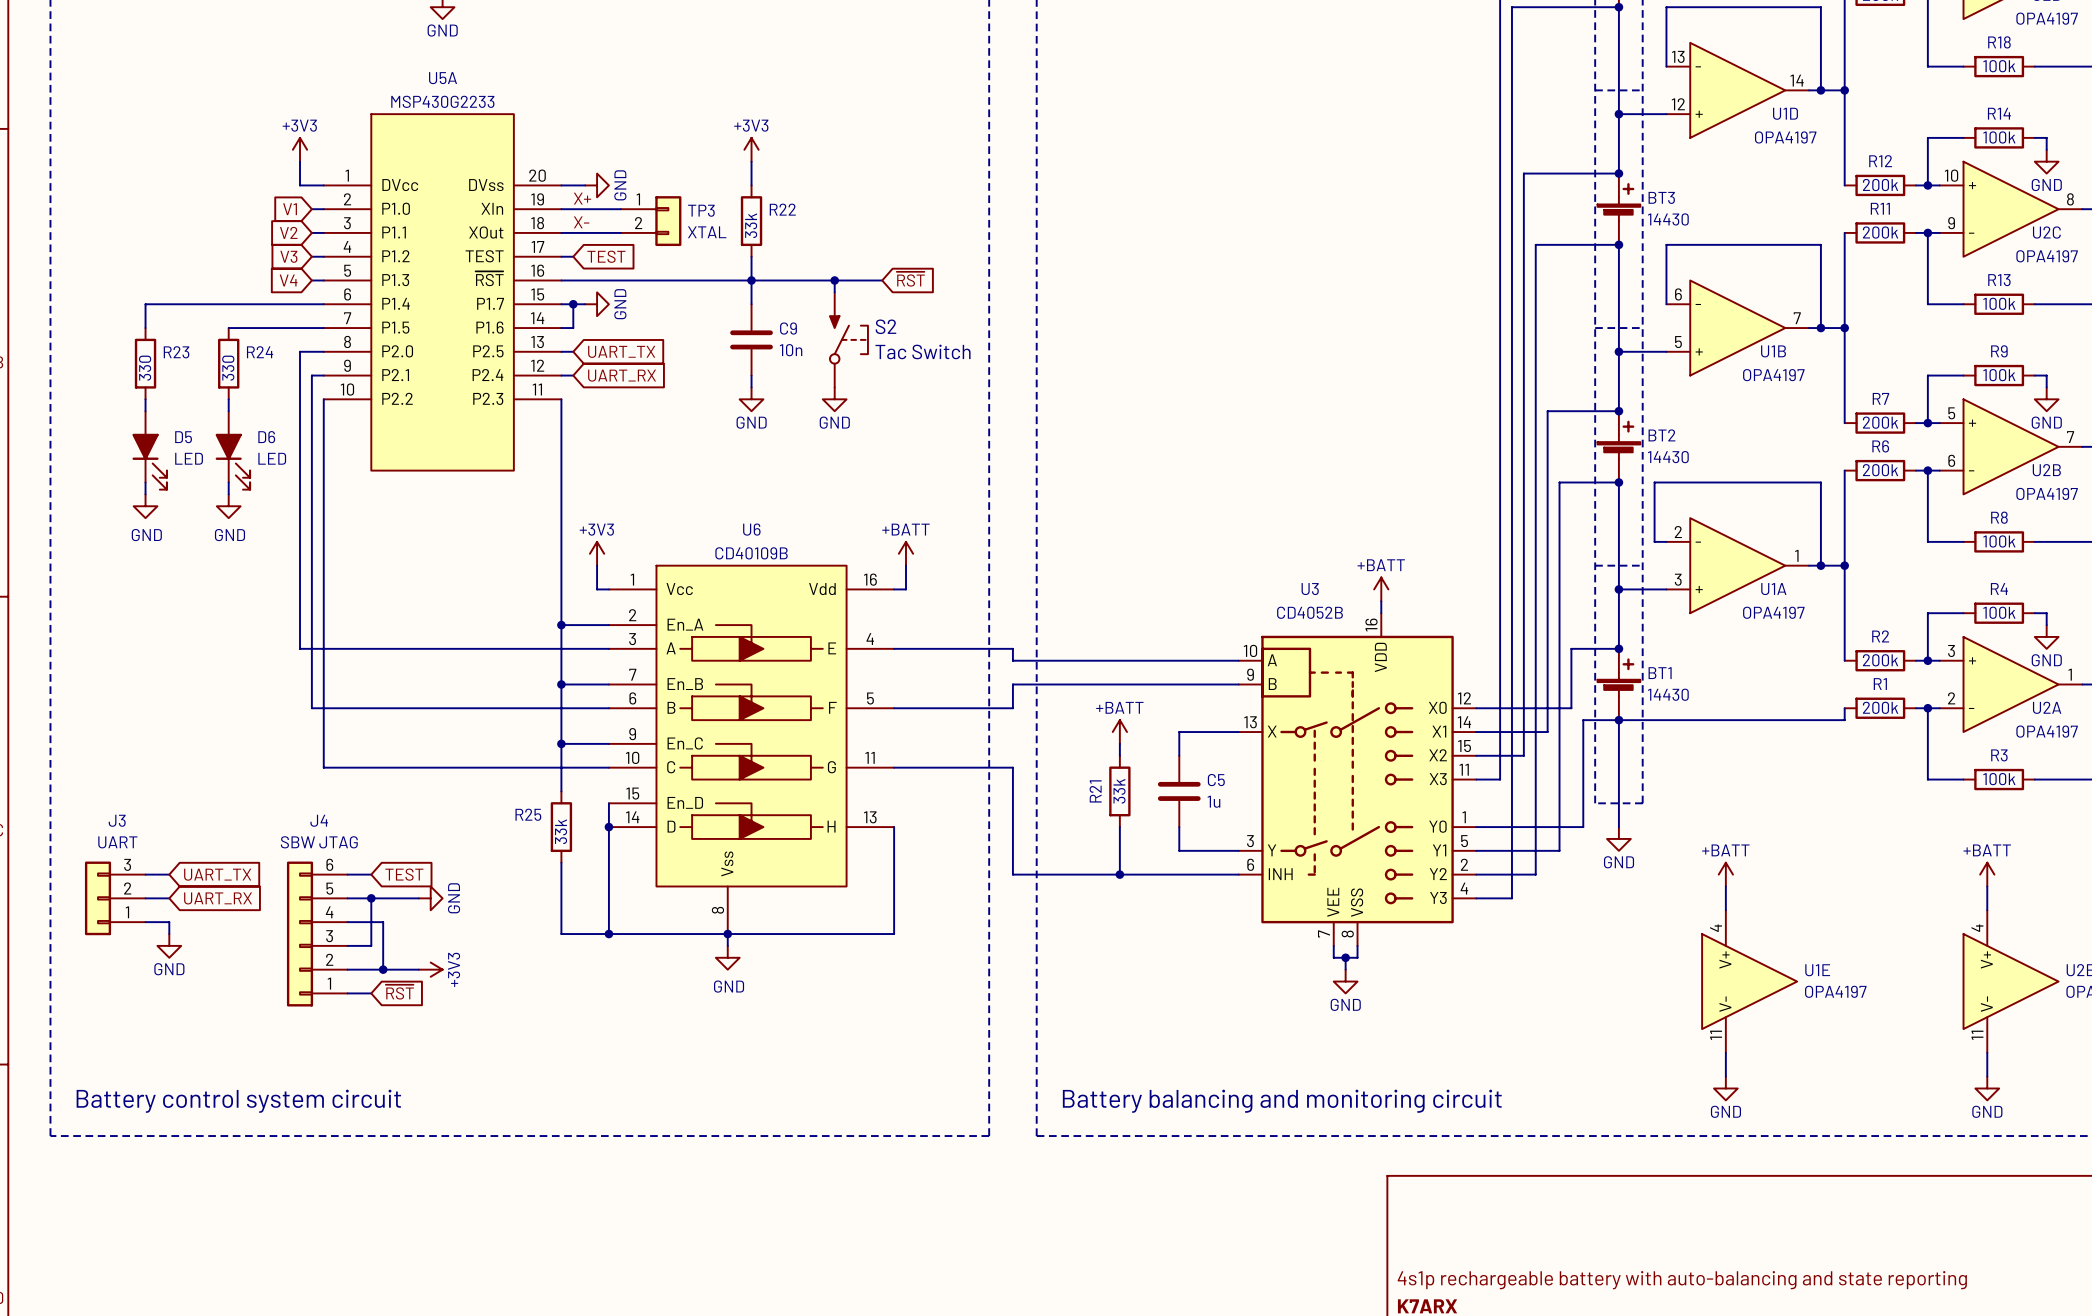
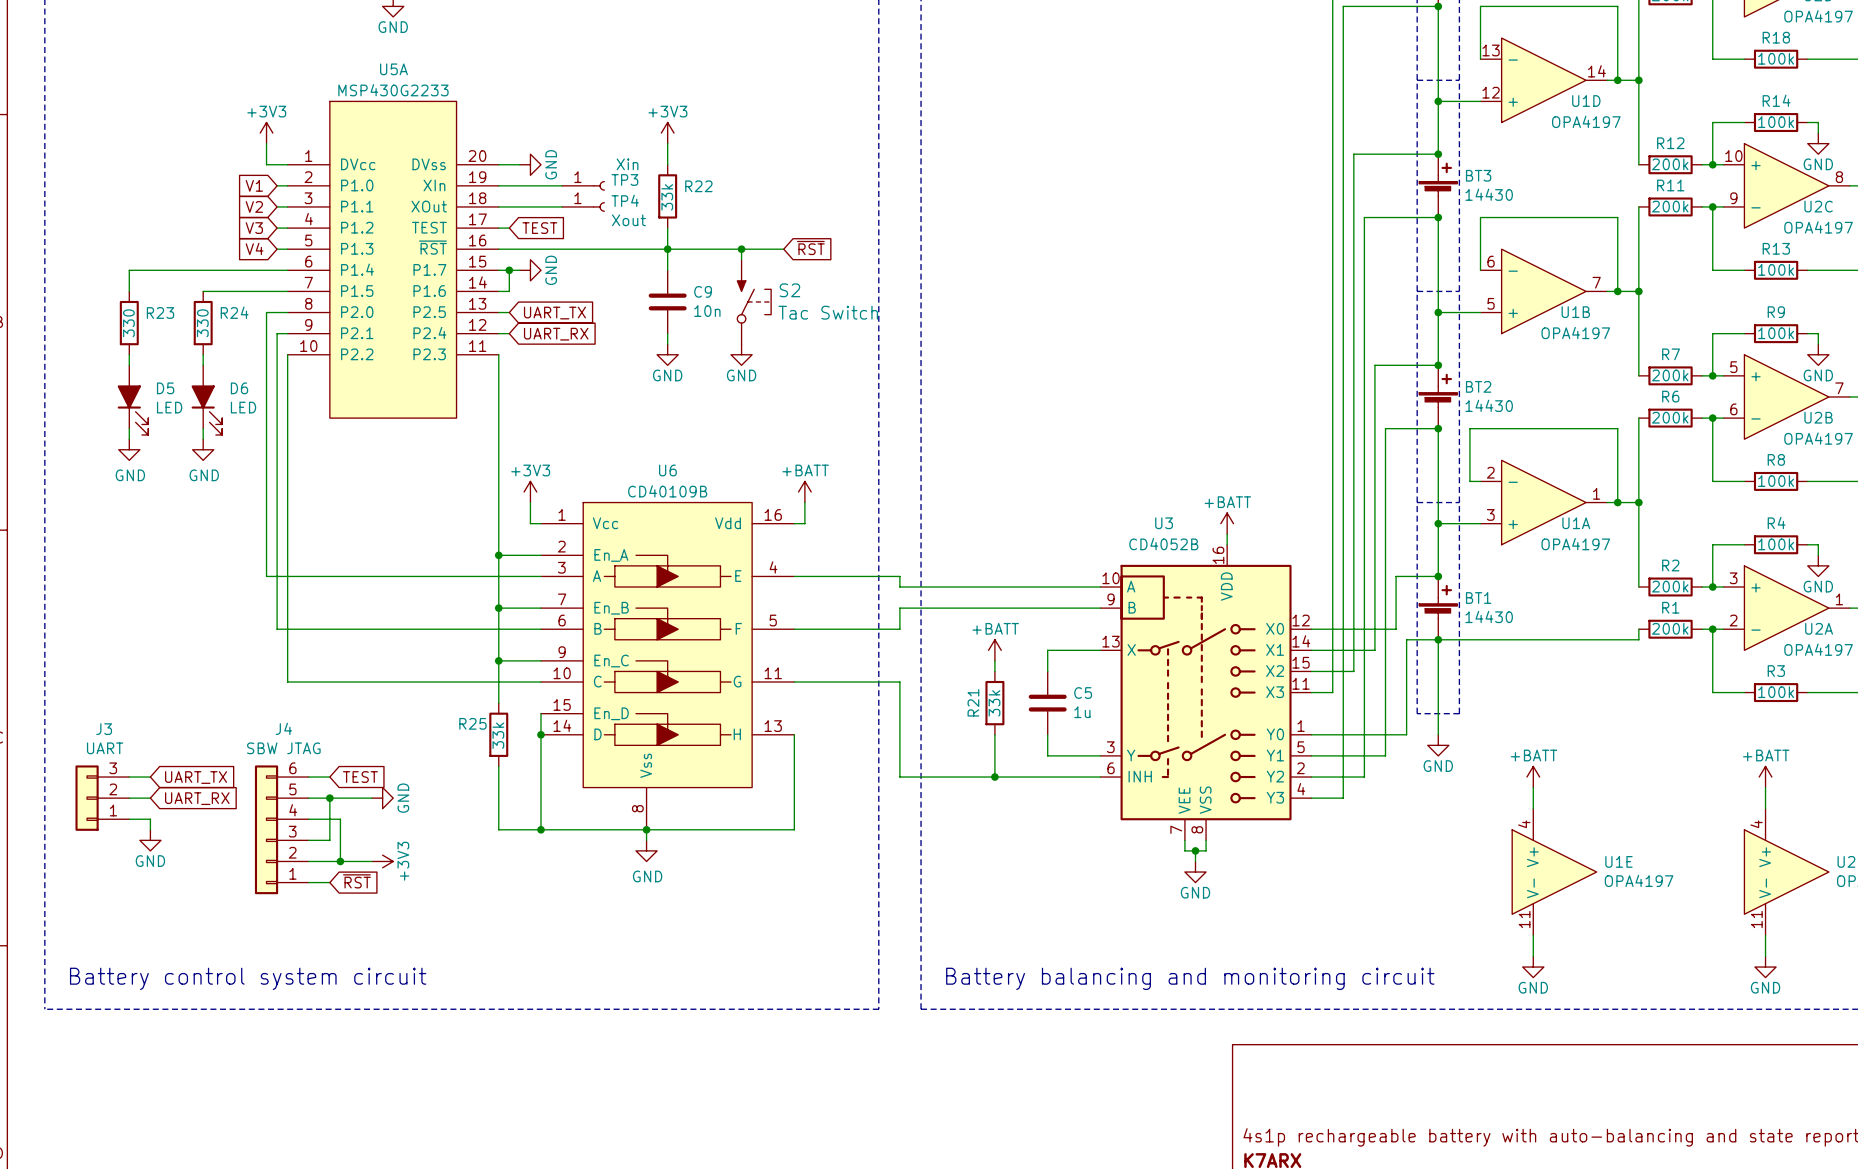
TP3 symbol: [620, 196, 682, 247] -> [562, 181, 605, 191]
label: X+ (582, 198) -> none
label: X- (581, 222) -> none
TP4: none -> Xout (583, 206)
TP3 value: XTAL (707, 232) -> Xin (627, 164)

